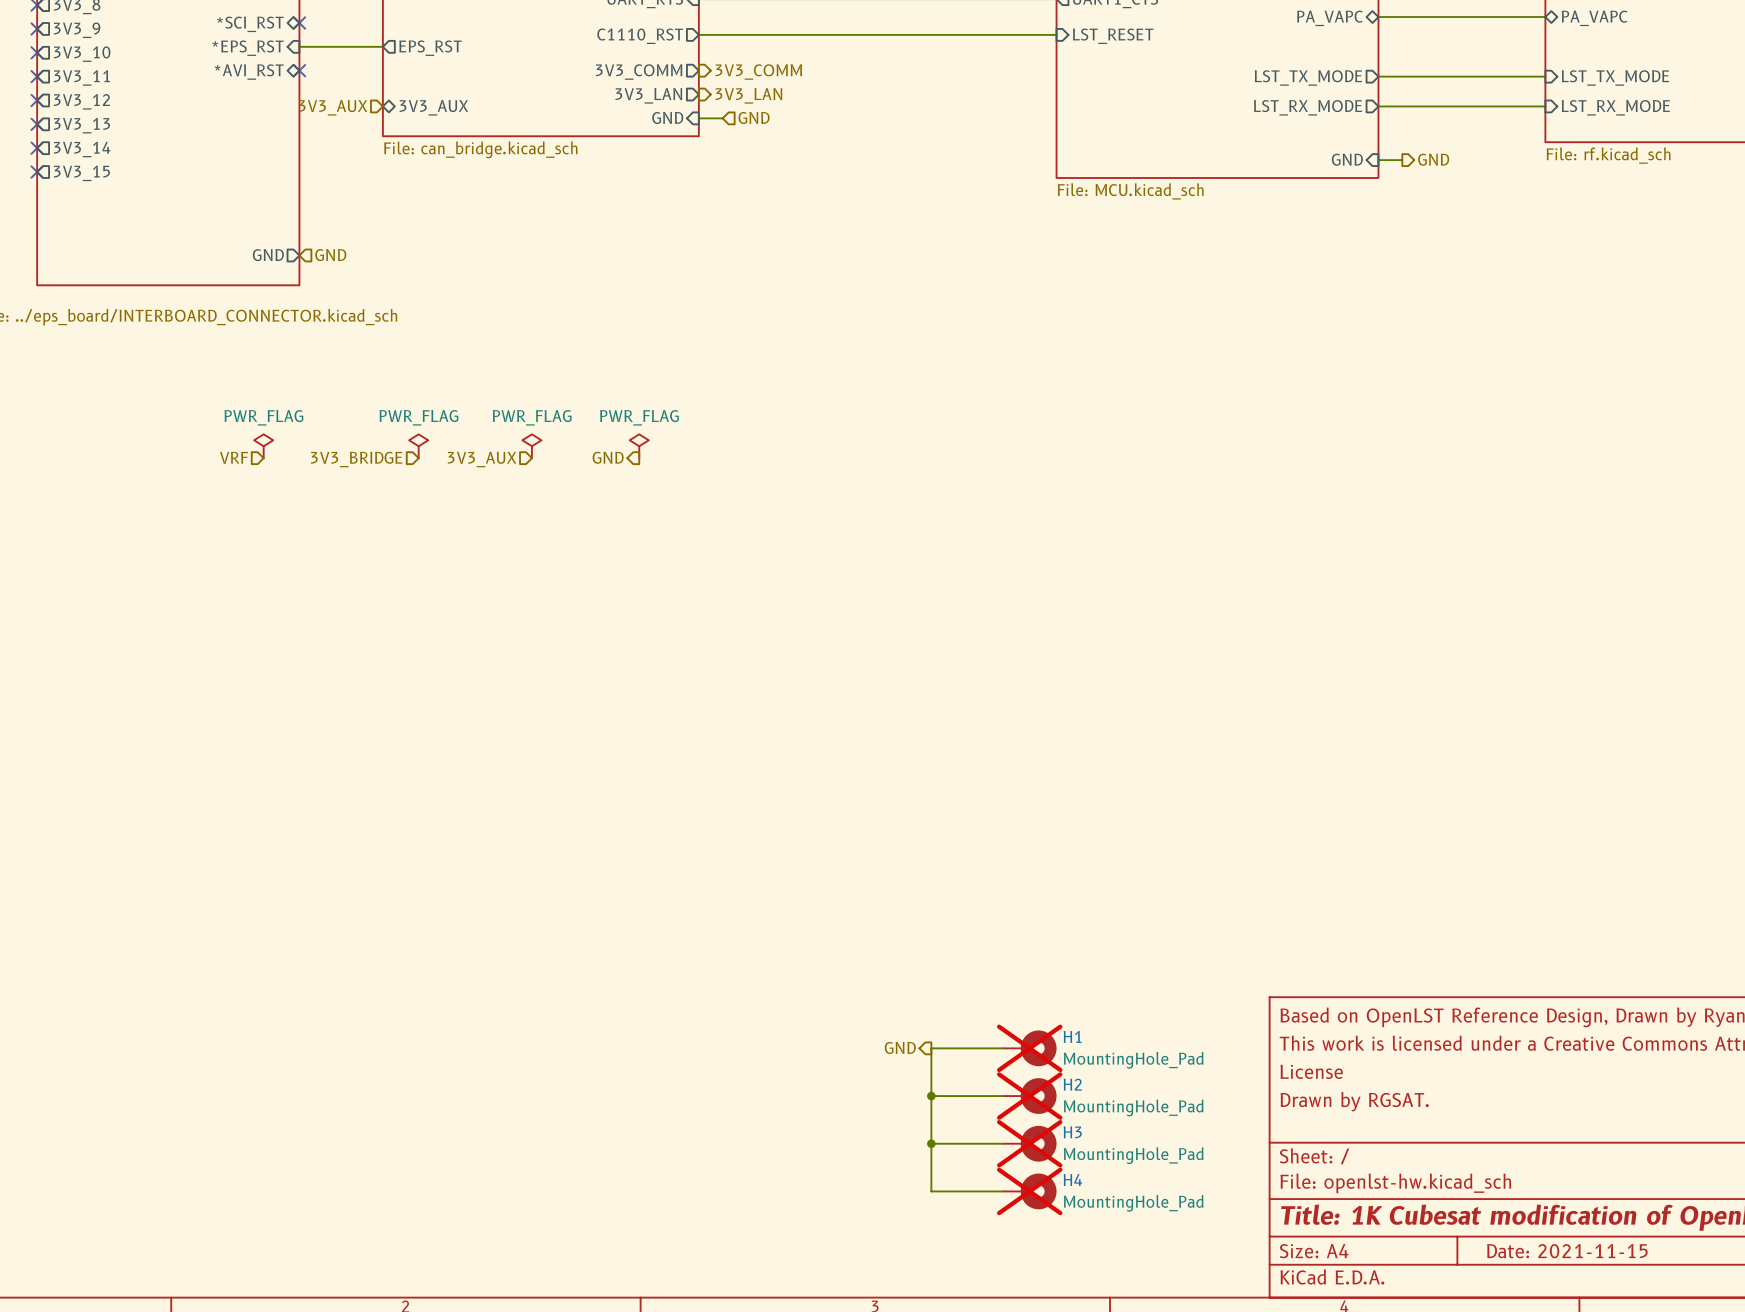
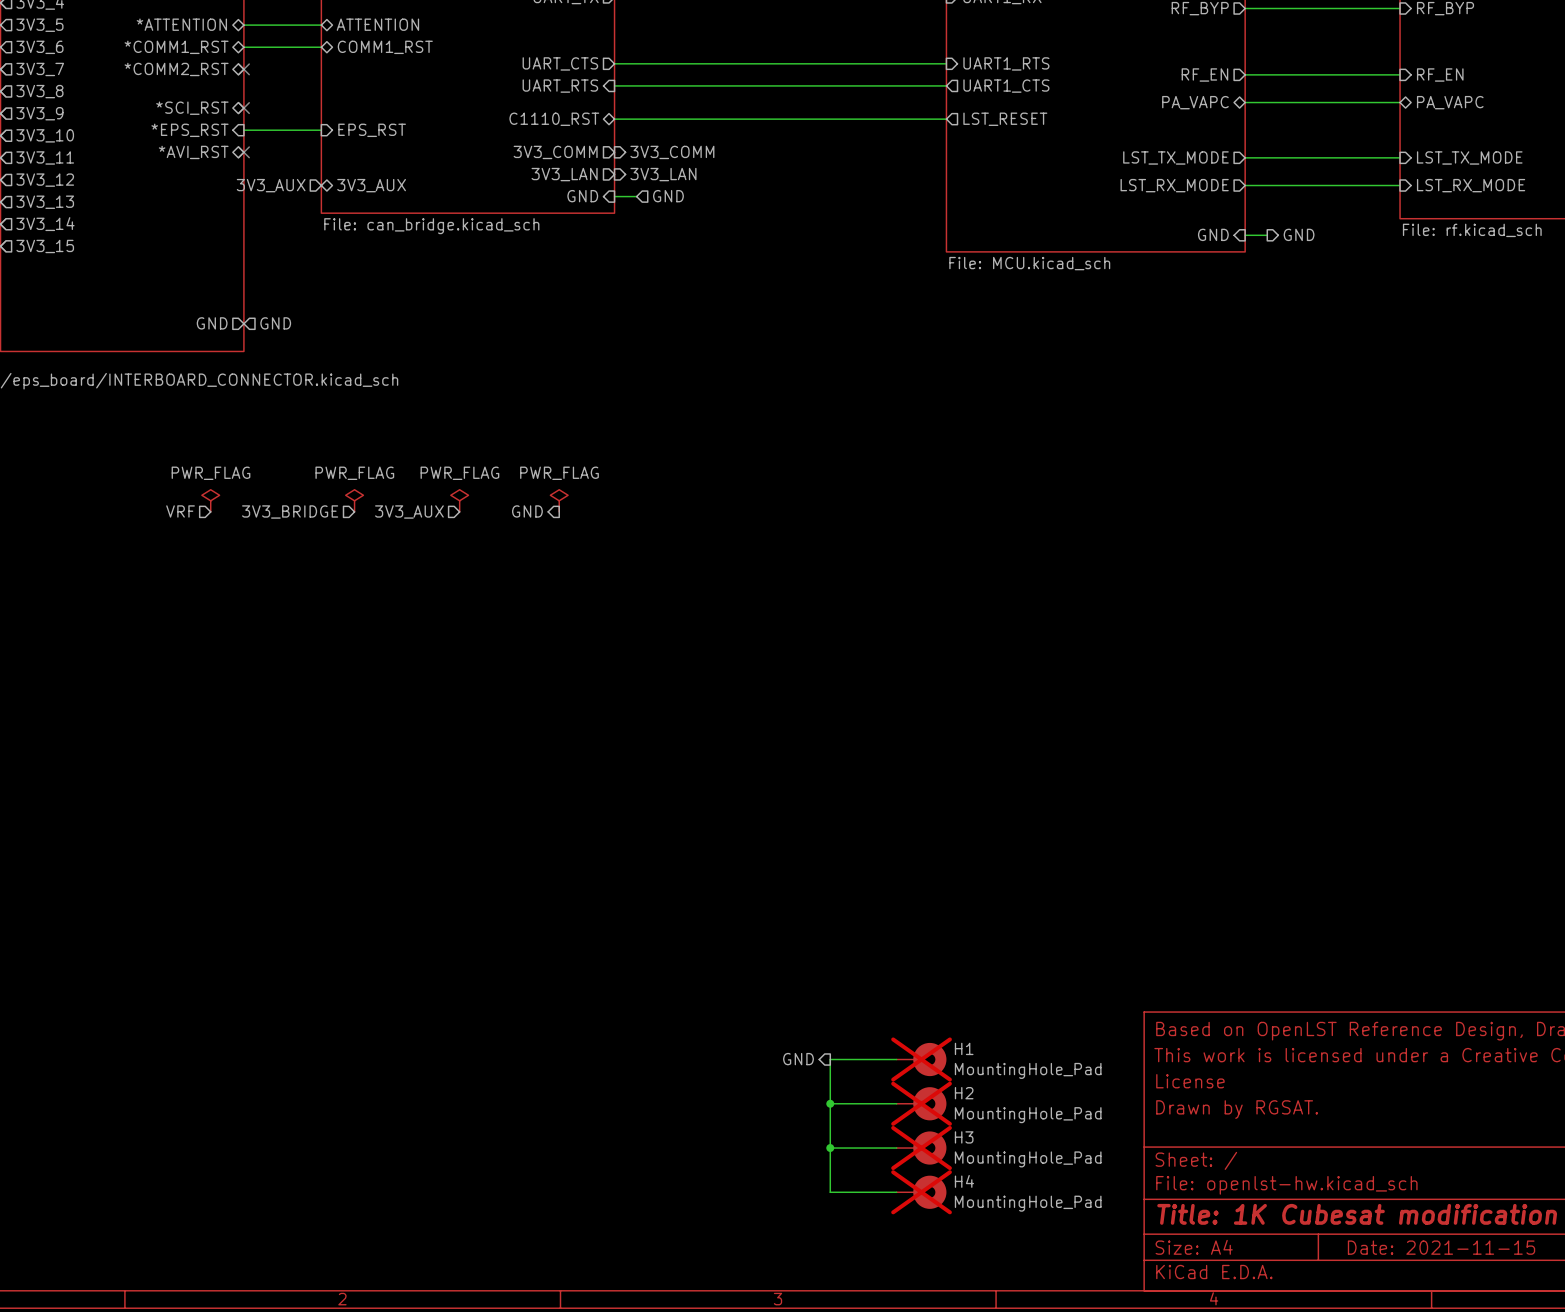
sheet pin shape: output (640, 36) -> bidirectional (554, 119)
sheet pin shape: input (1113, 36) -> output (1005, 119)
sheet pin shape: output (430, 48) -> input (372, 130)

